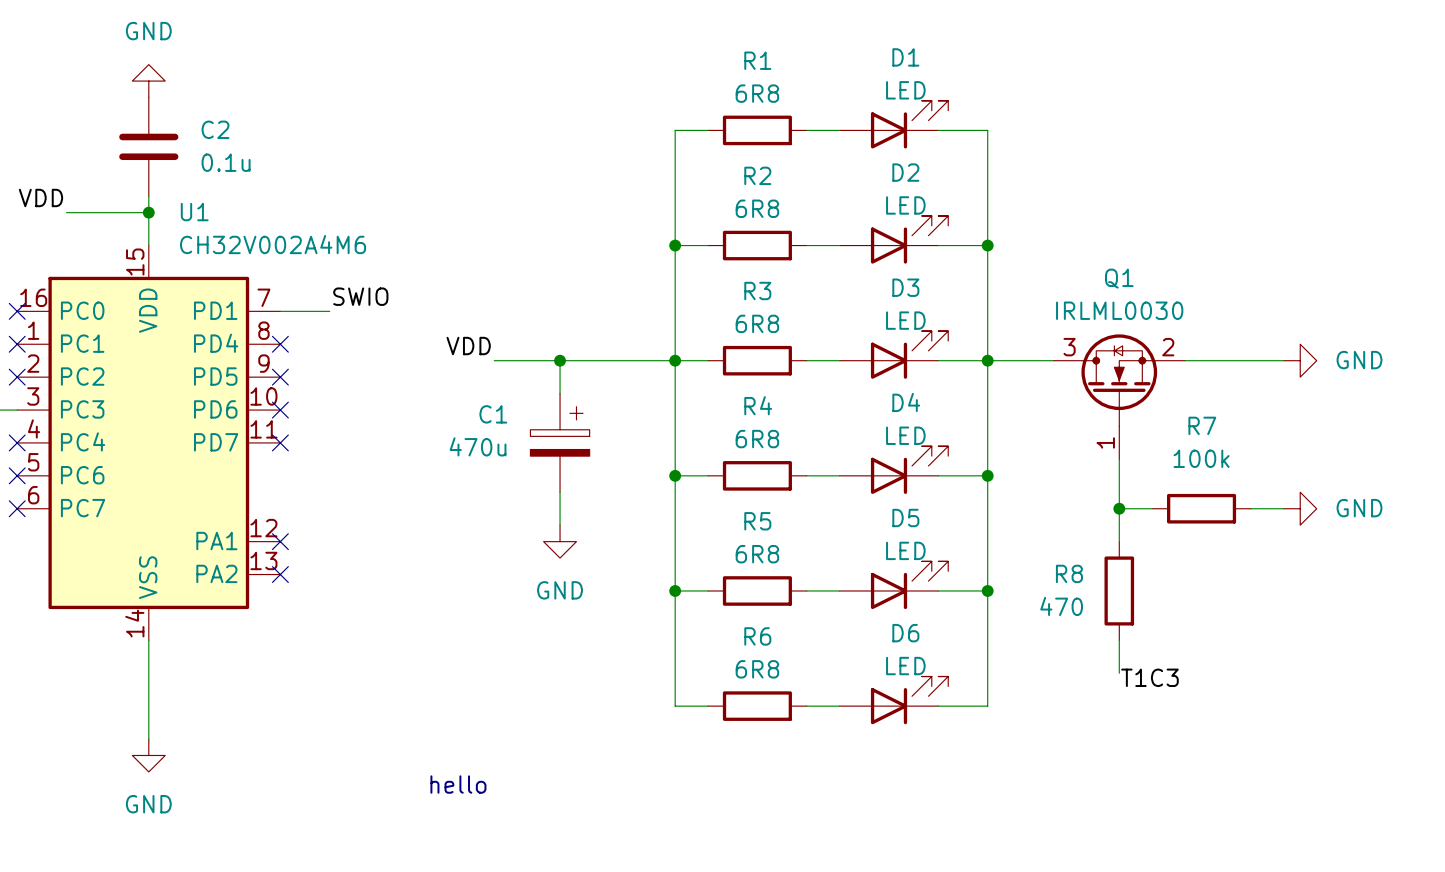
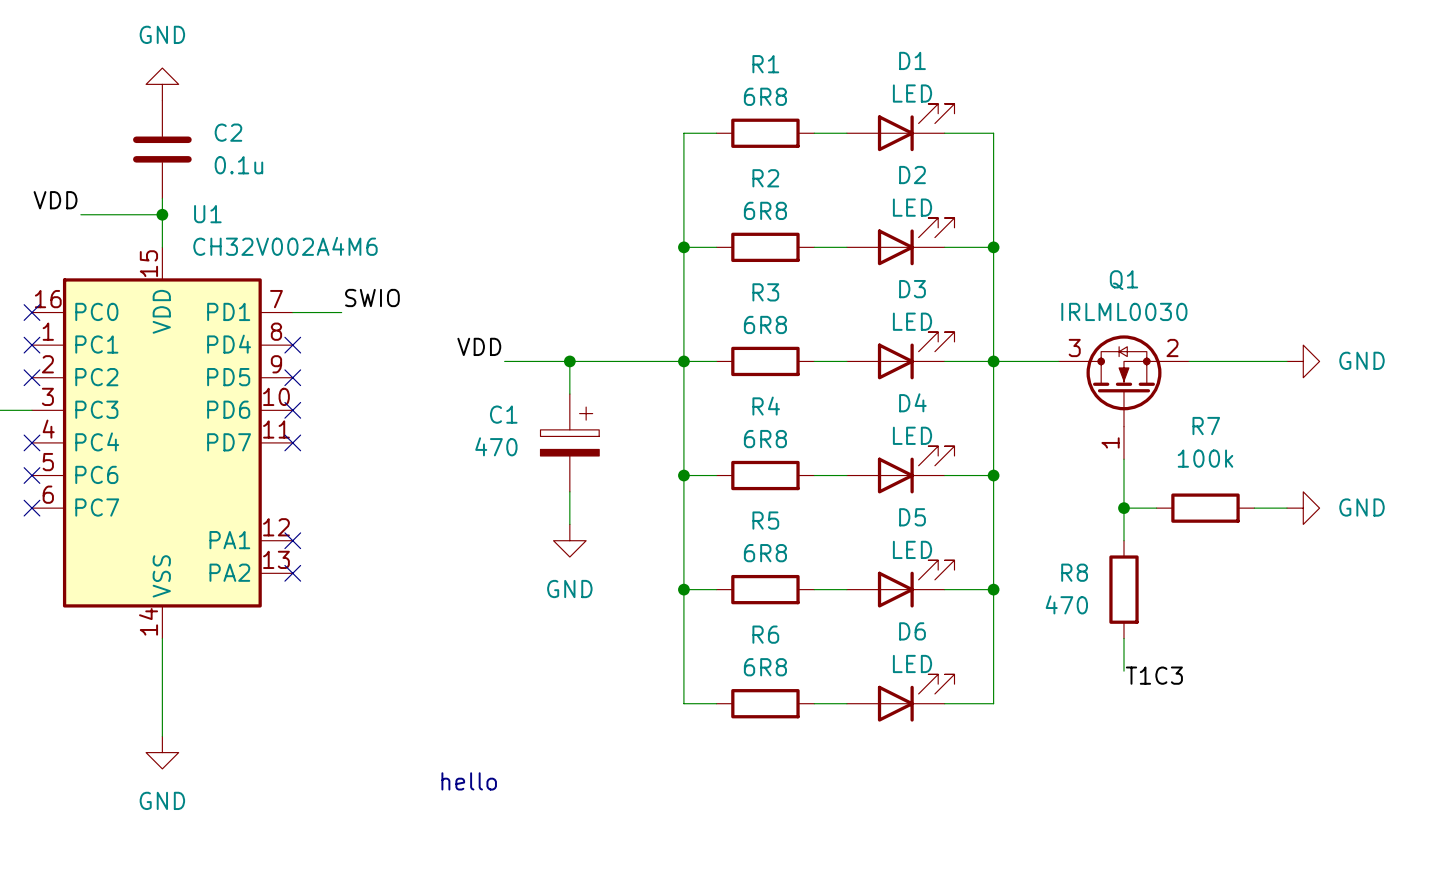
C1 value: 470u (478, 446) -> 470 (496, 446)

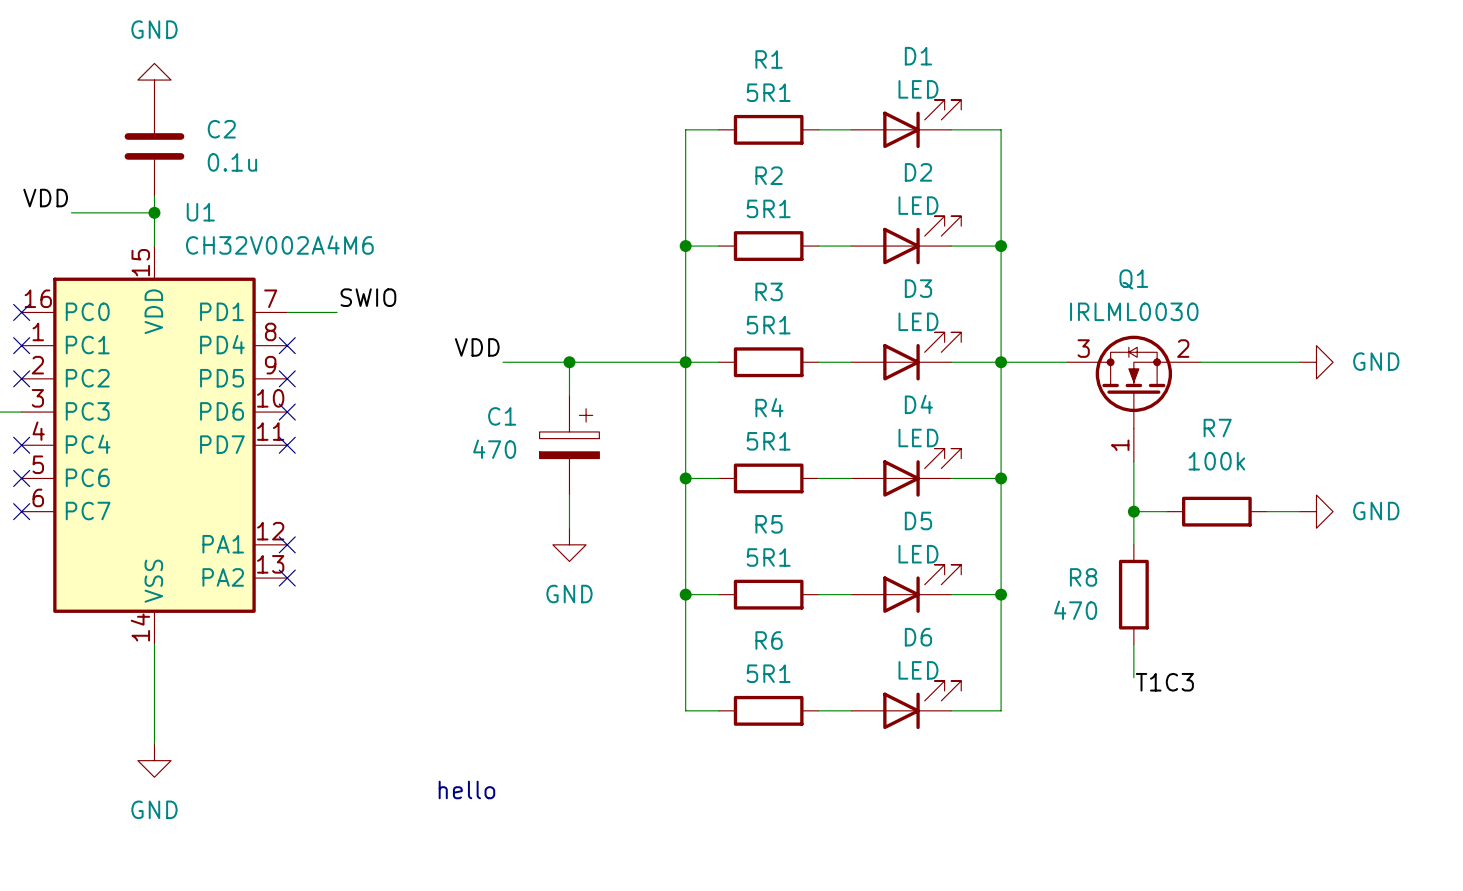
R1 value: 6R8 (765, 96) -> 5R1 (768, 92)
R2 value: 6R8 (765, 210) -> 5R1 (768, 208)
R3 value: 6R8 (765, 324) -> 5R1 (768, 325)
R4 value: 6R8 (765, 439) -> 5R1 (768, 441)
R5 value: 6R8 (765, 553) -> 5R1 (768, 557)
R6 value: 6R8 (765, 667) -> 5R1 (768, 673)

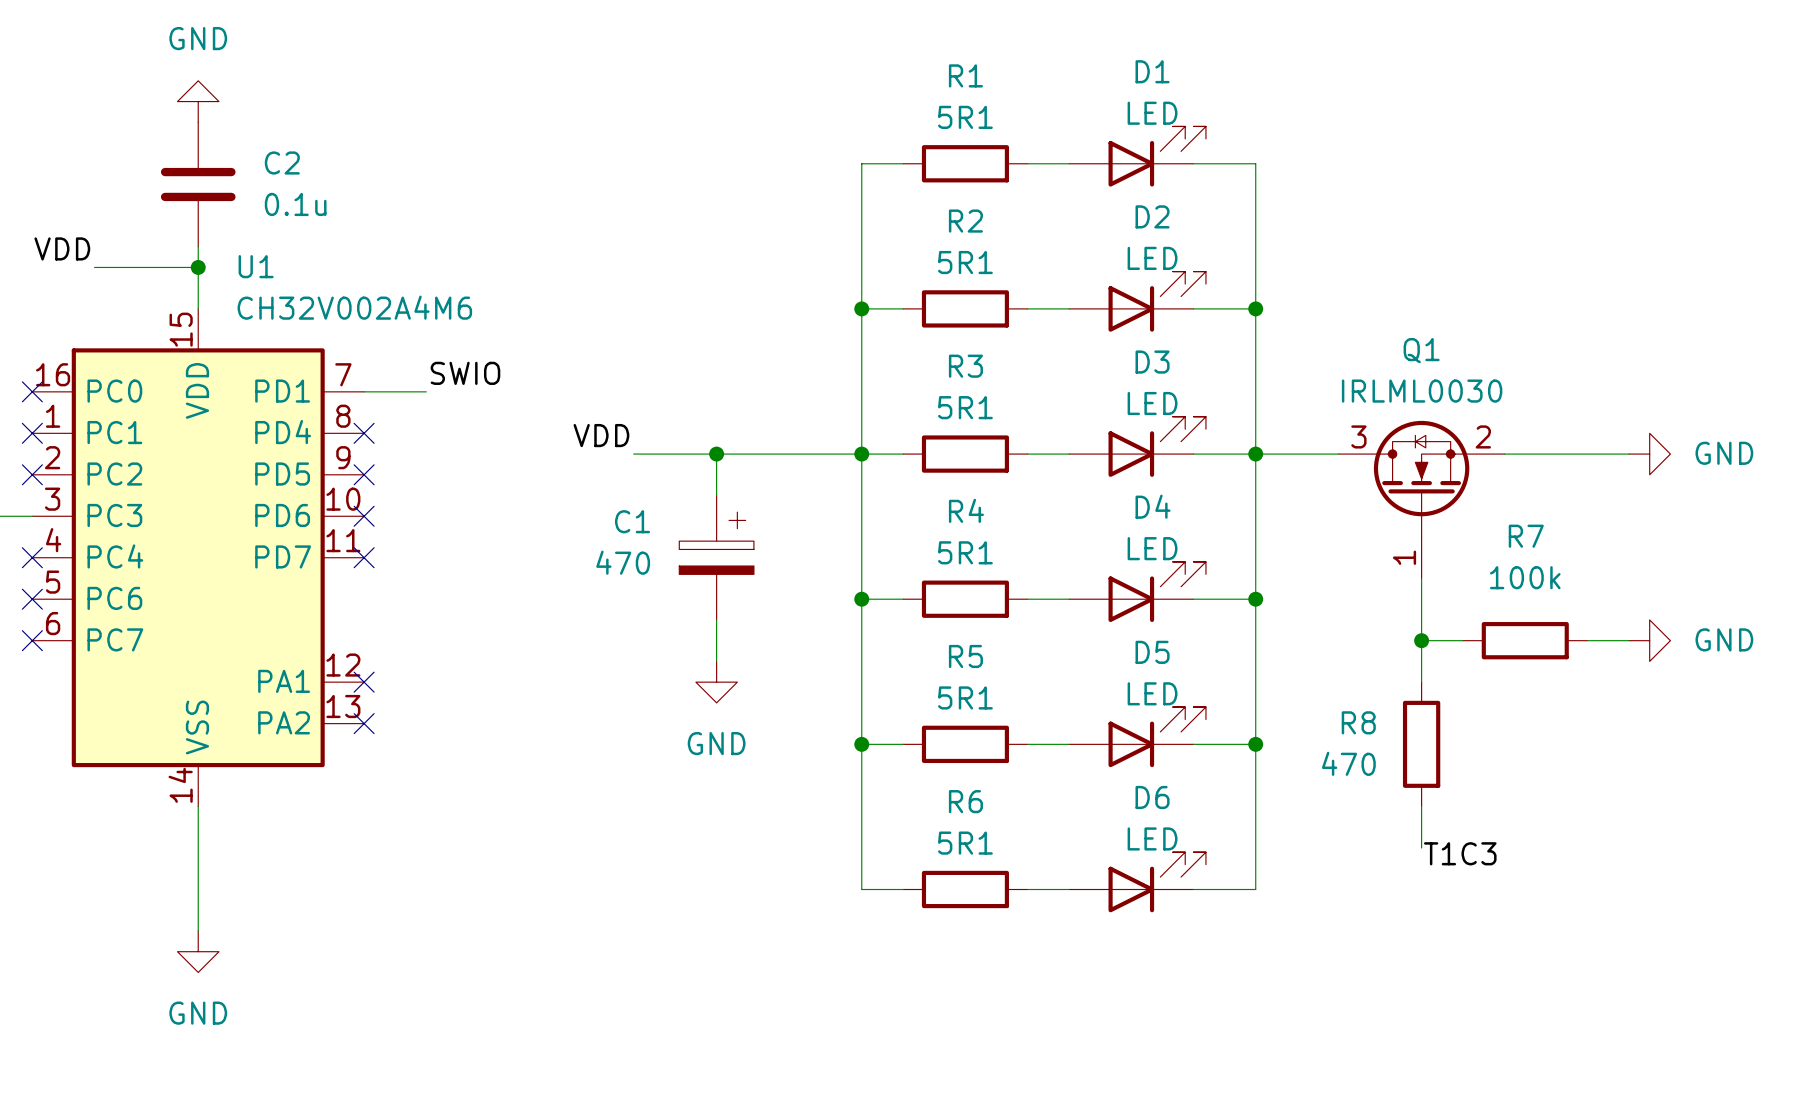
text: hello (466, 789) -> none

